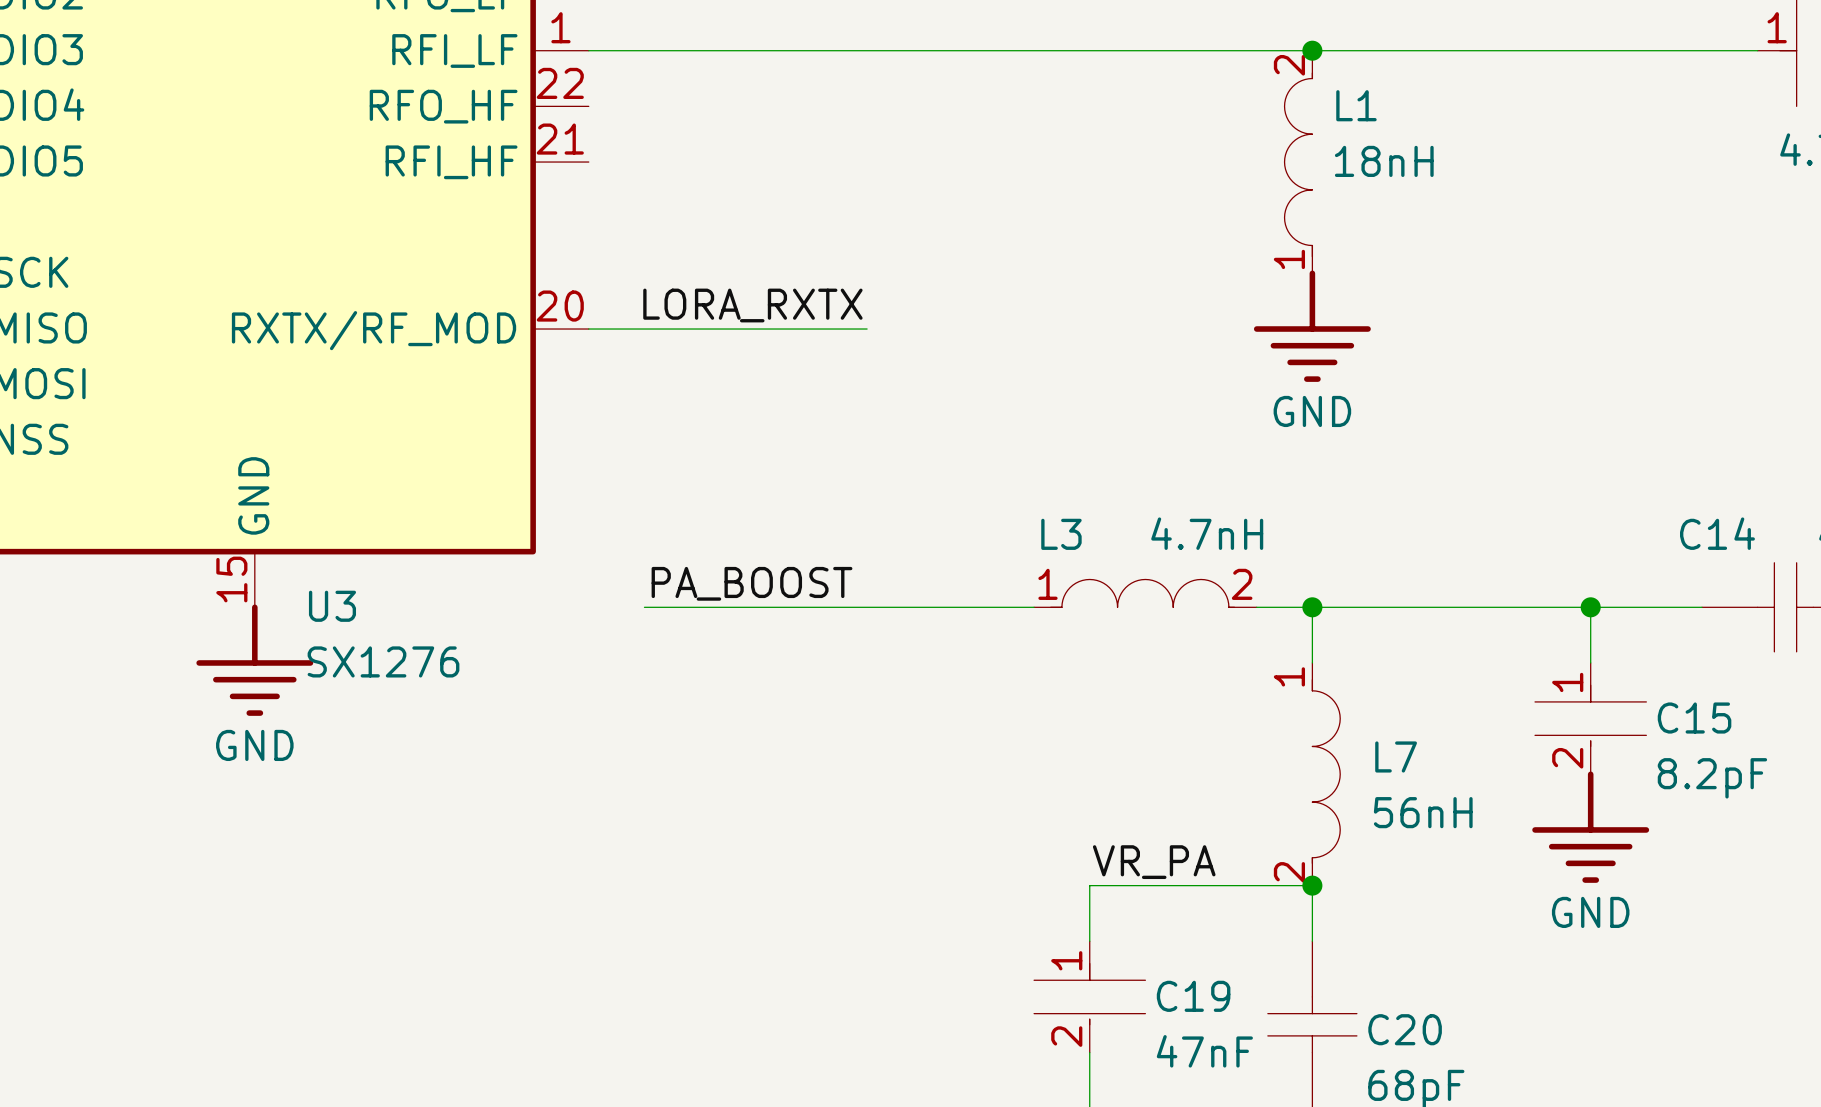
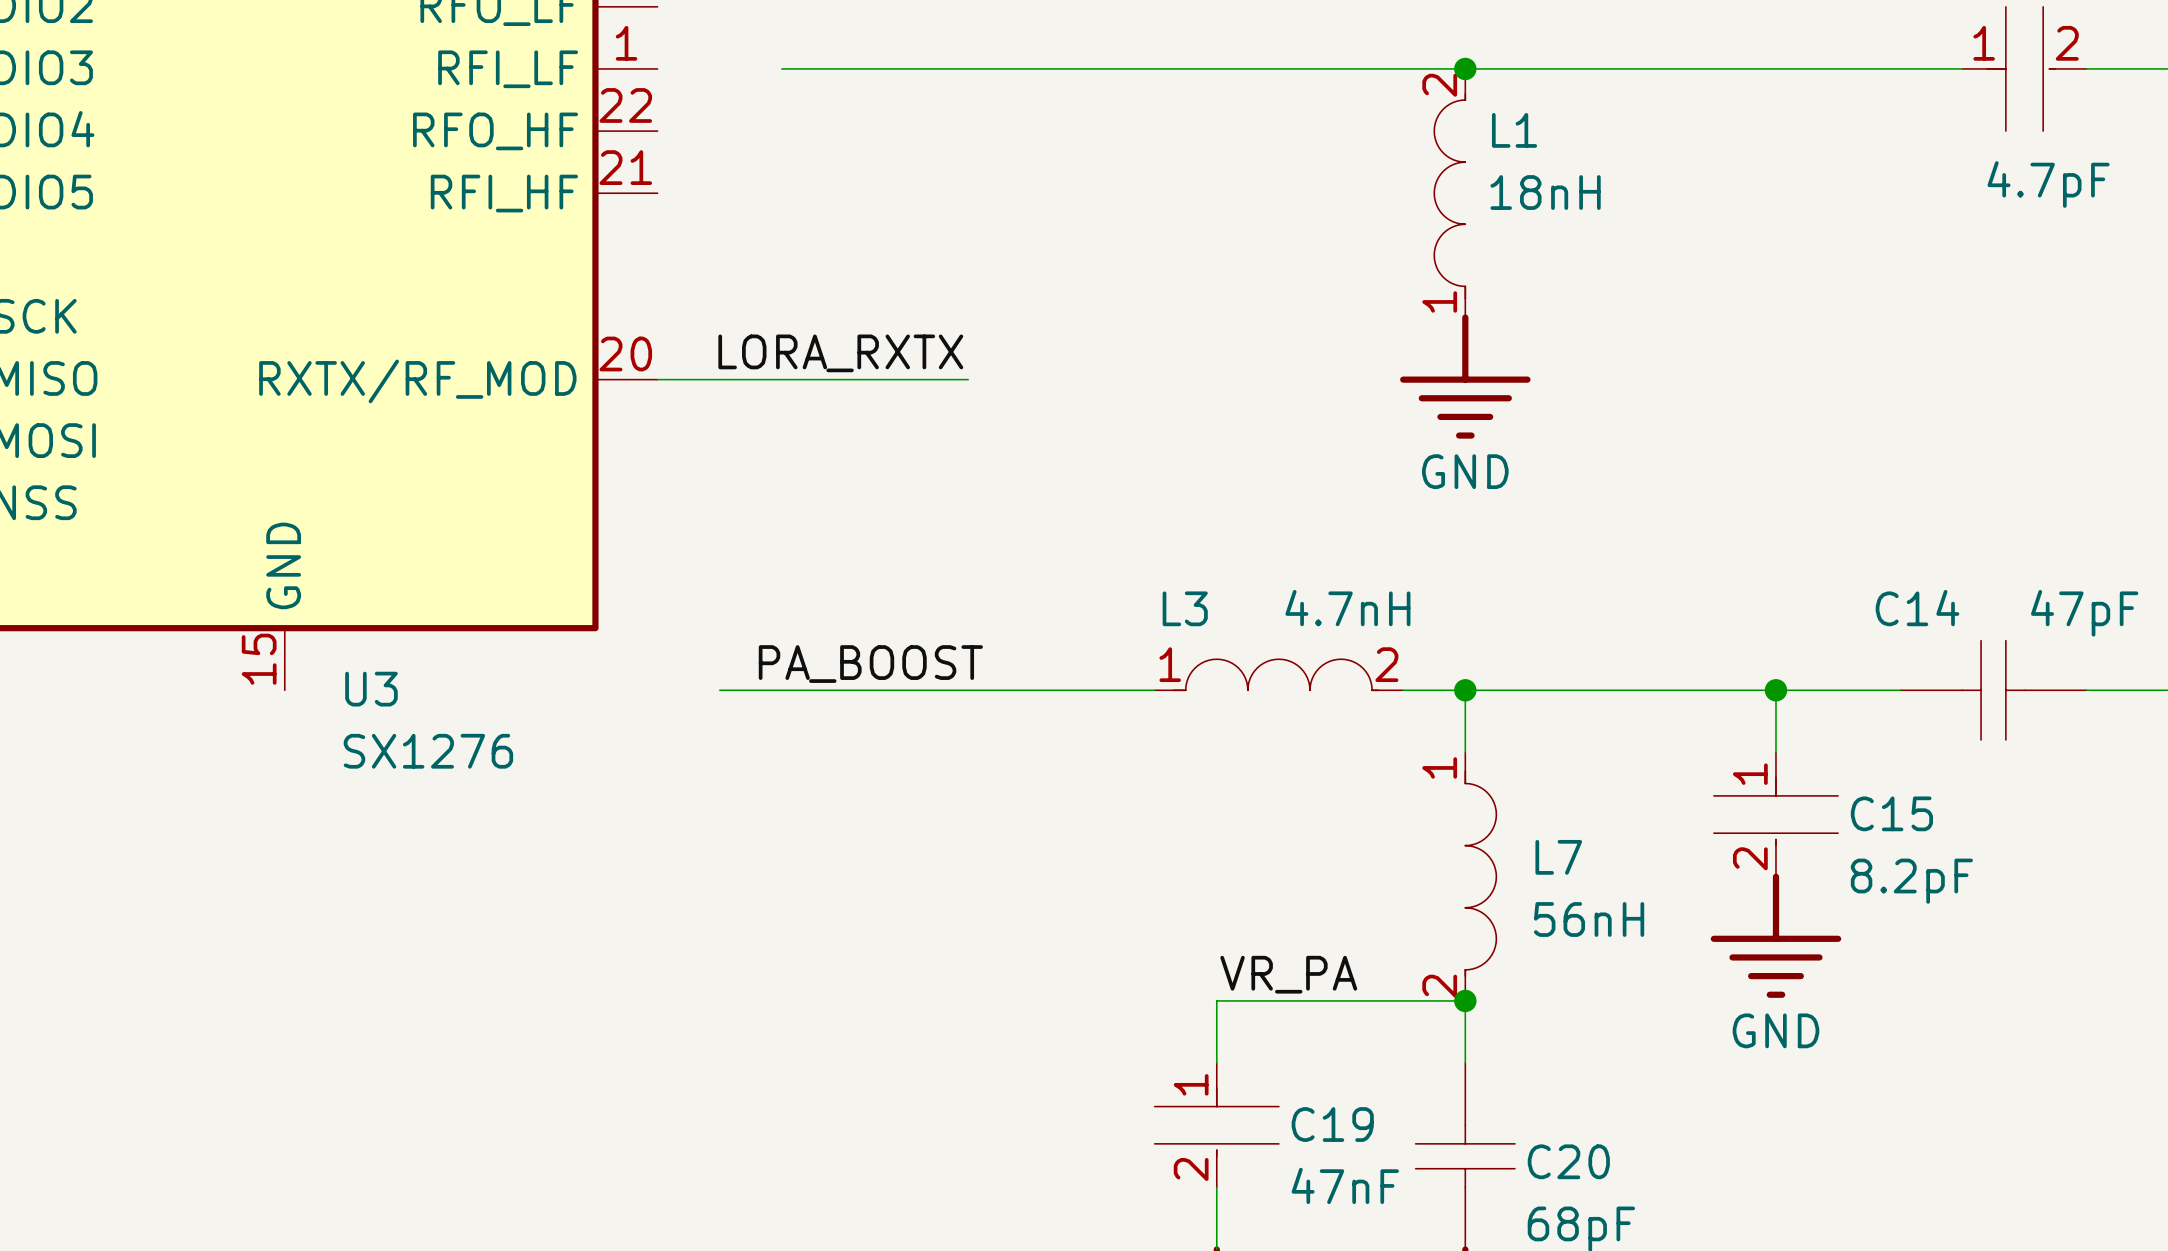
wire: (588, 50) (700, 50) -> none
label position: PA_BOOST (752, 583) -> PA_BOOST (870, 664)
power symbol: GND (254, 660) -> none

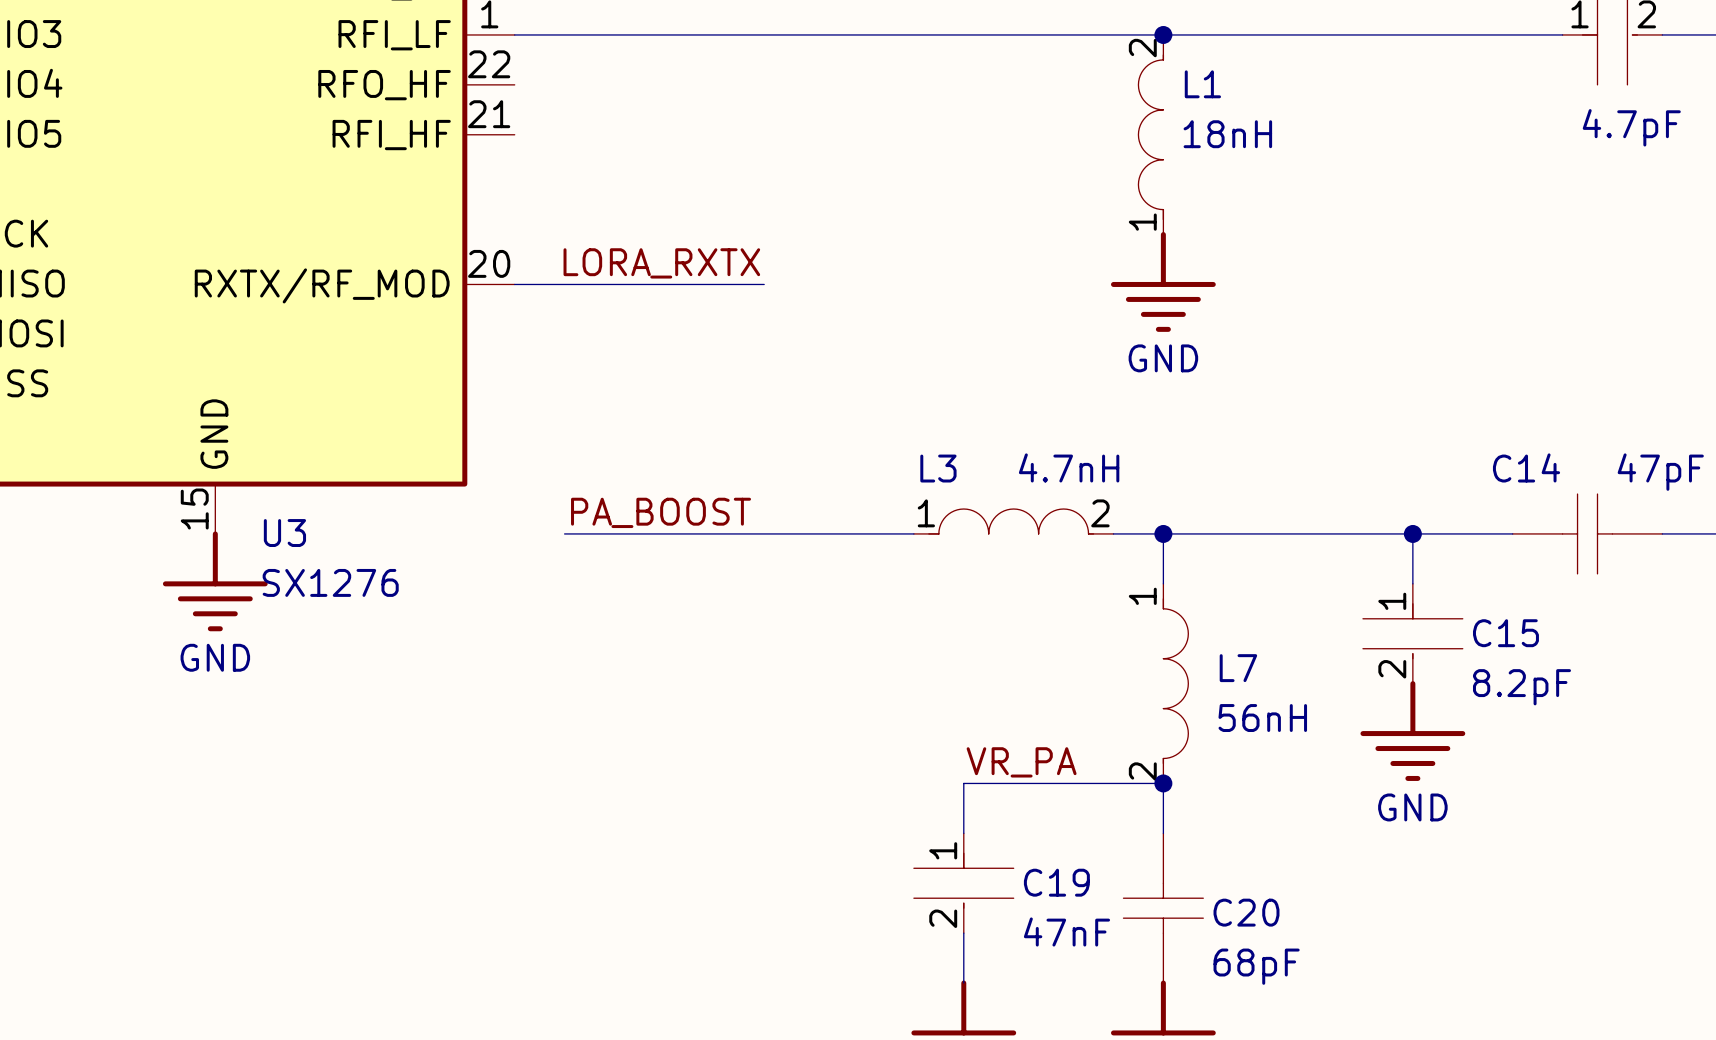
wire: none -> (514, 34) (614, 34)
label position: PA_BOOST (870, 664) -> PA_BOOST (661, 512)
power symbol: none -> GND (215, 581)

